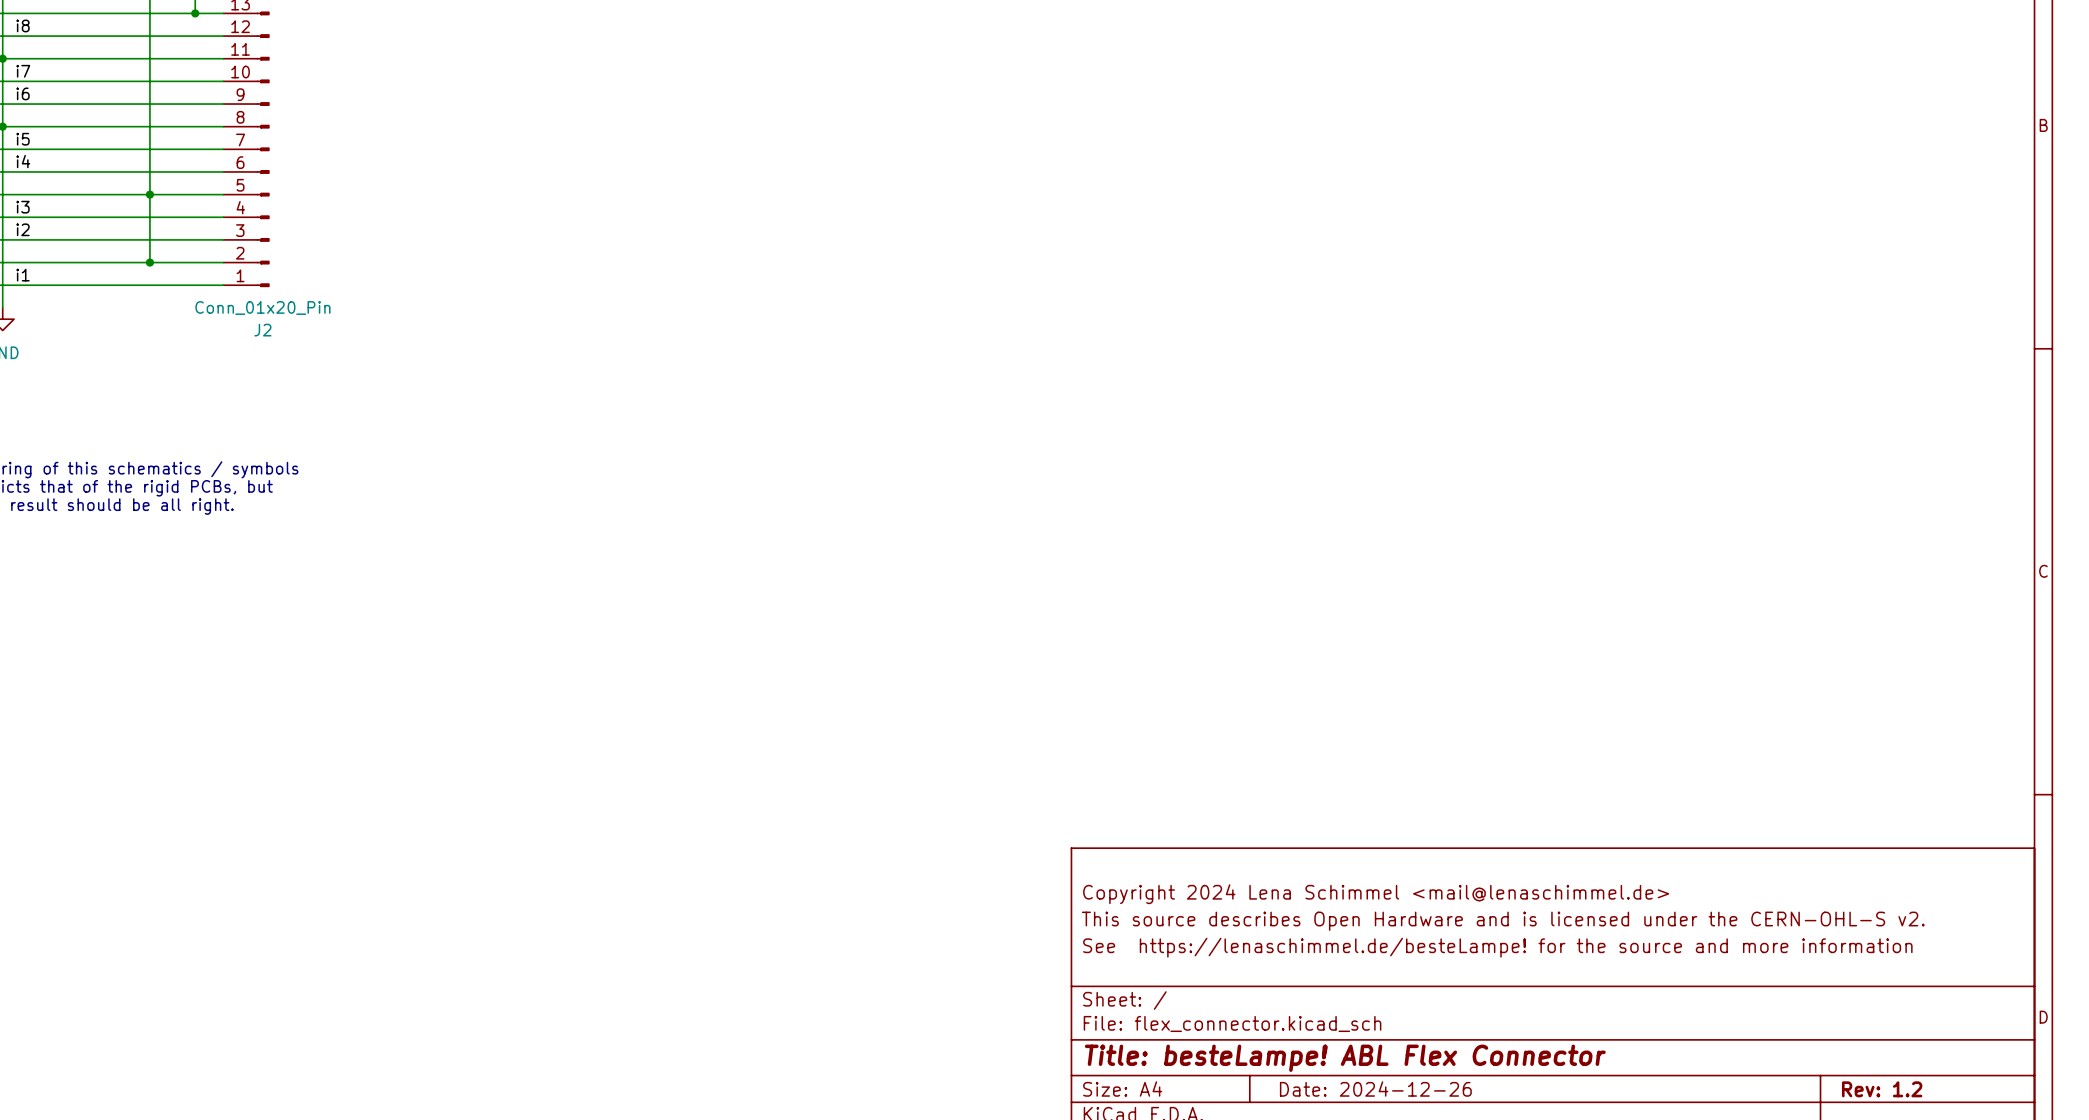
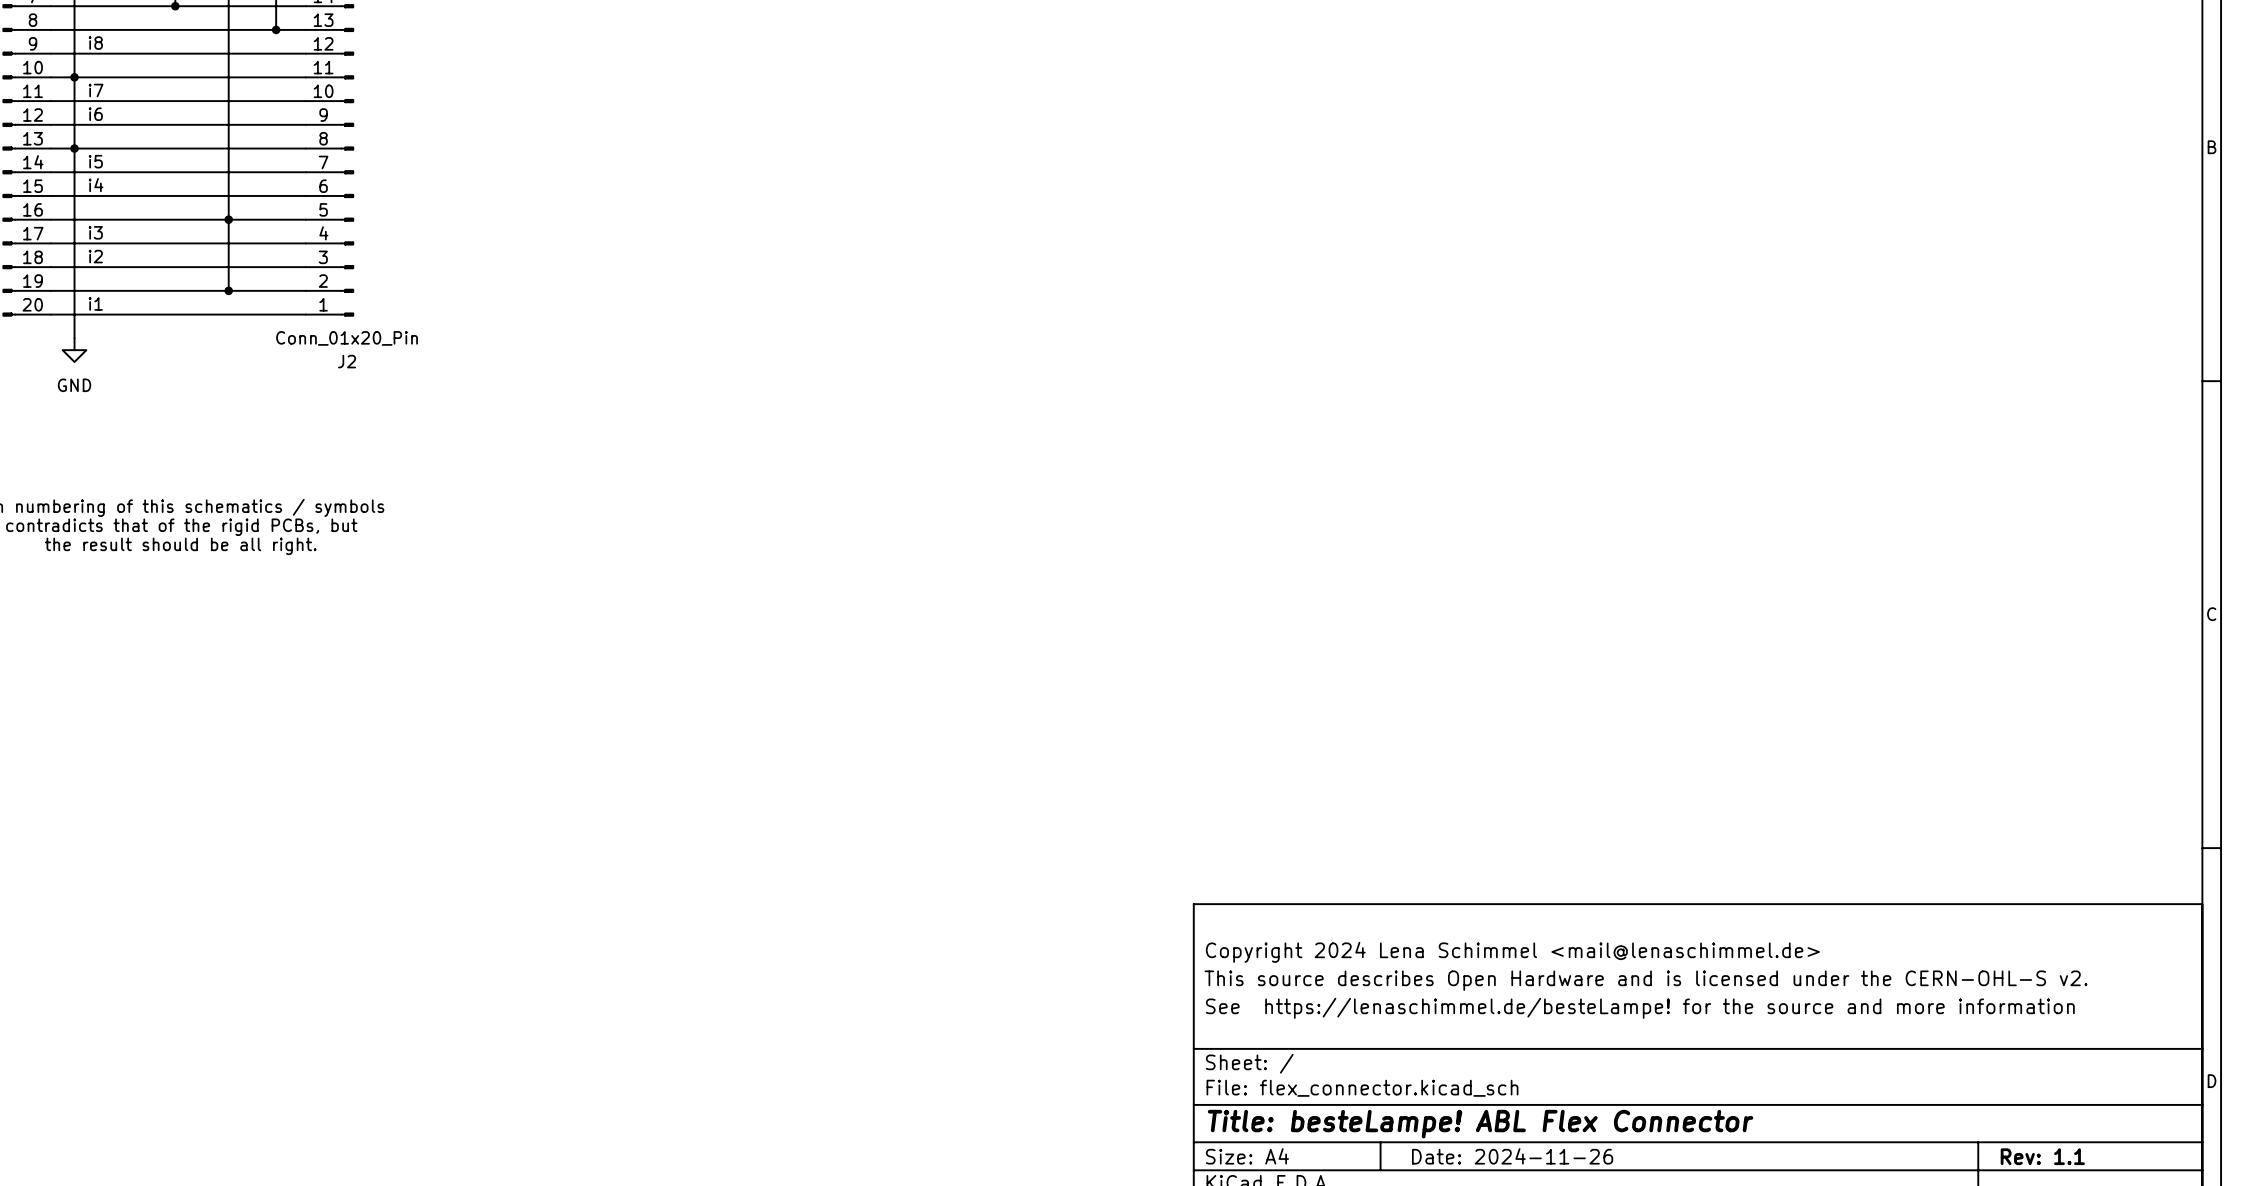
title block: Date: 2024-12-26 (1375, 1089) -> Date: 2024-11-26 (1512, 1156)
title block: Rev: 1.2 (1882, 1089) -> Rev: 1.1 (2042, 1156)

